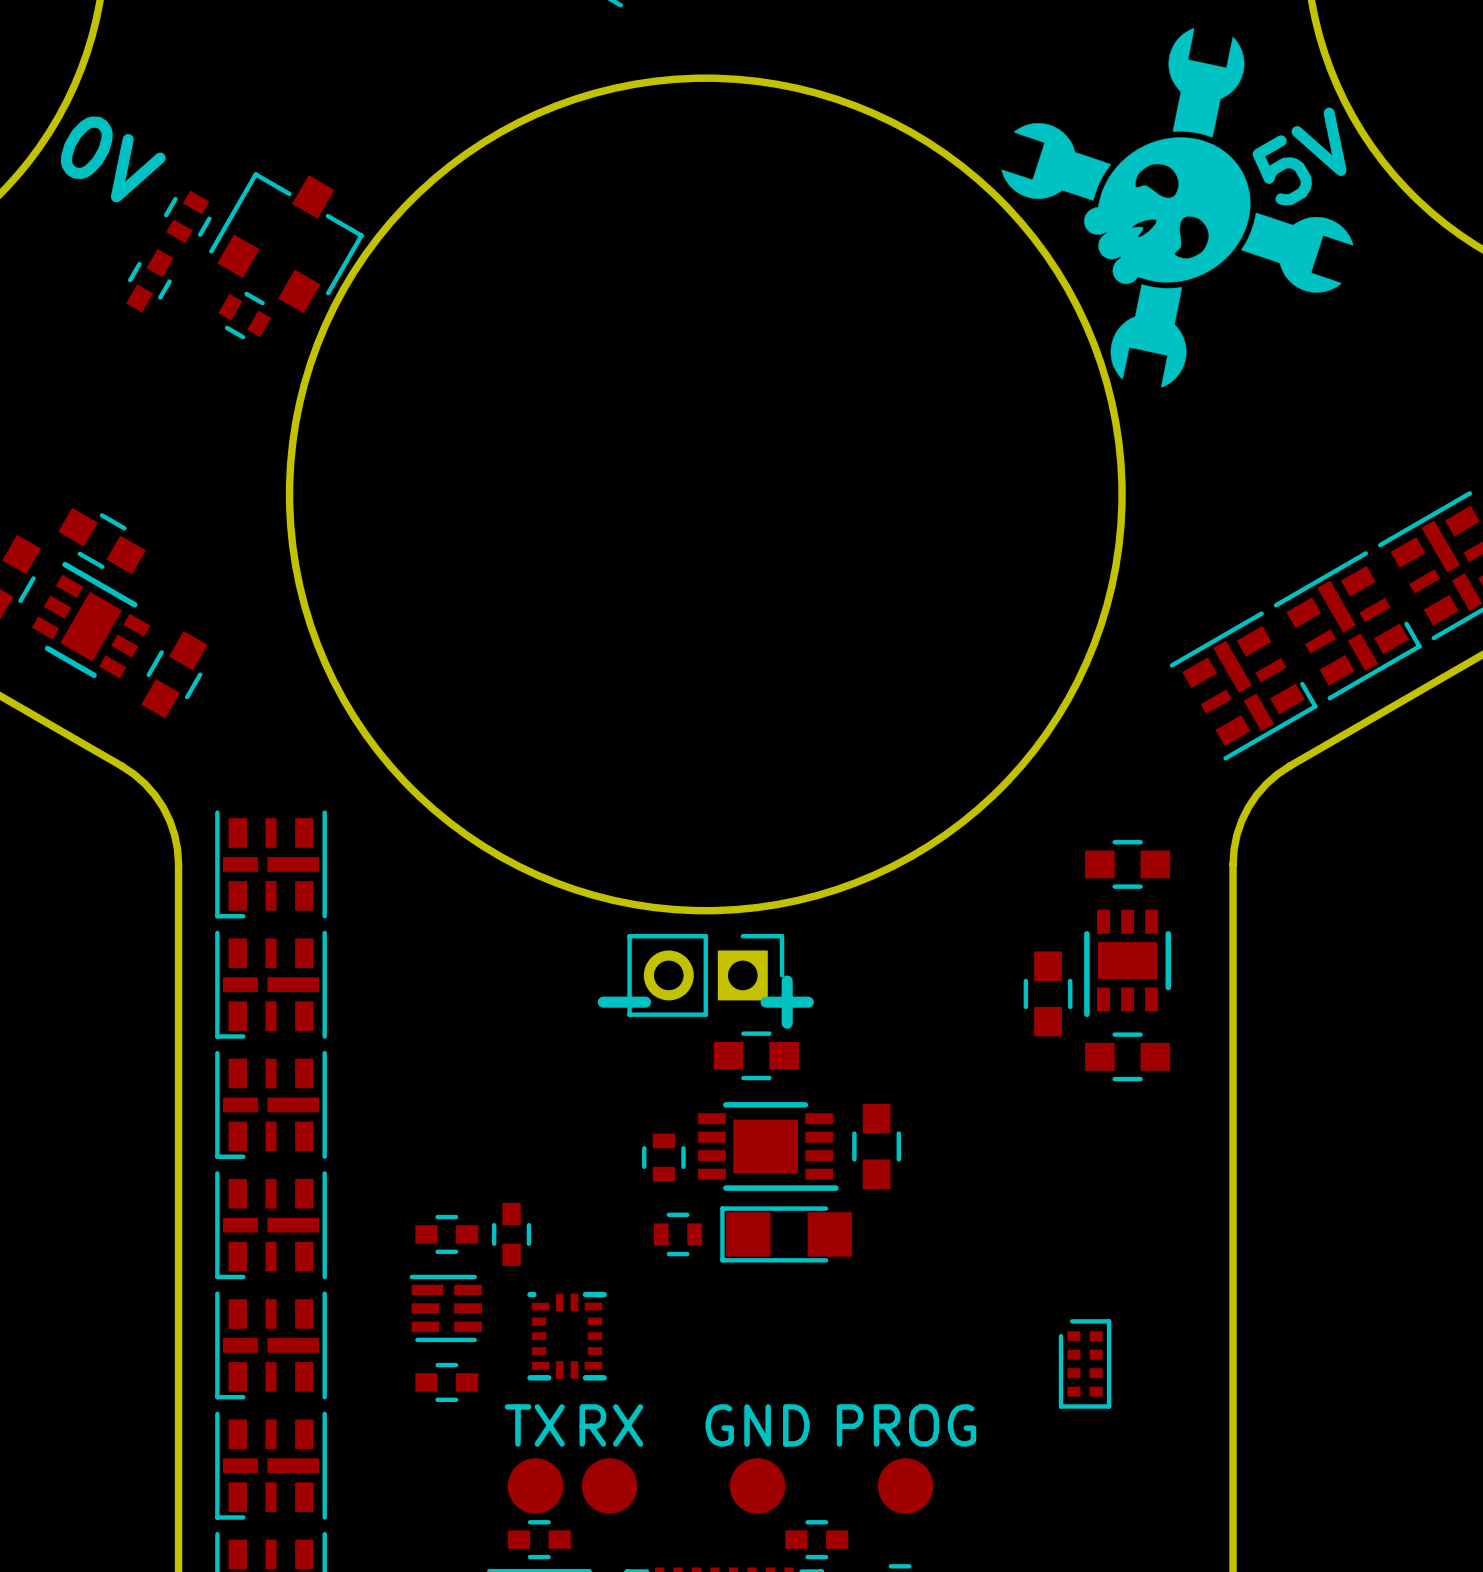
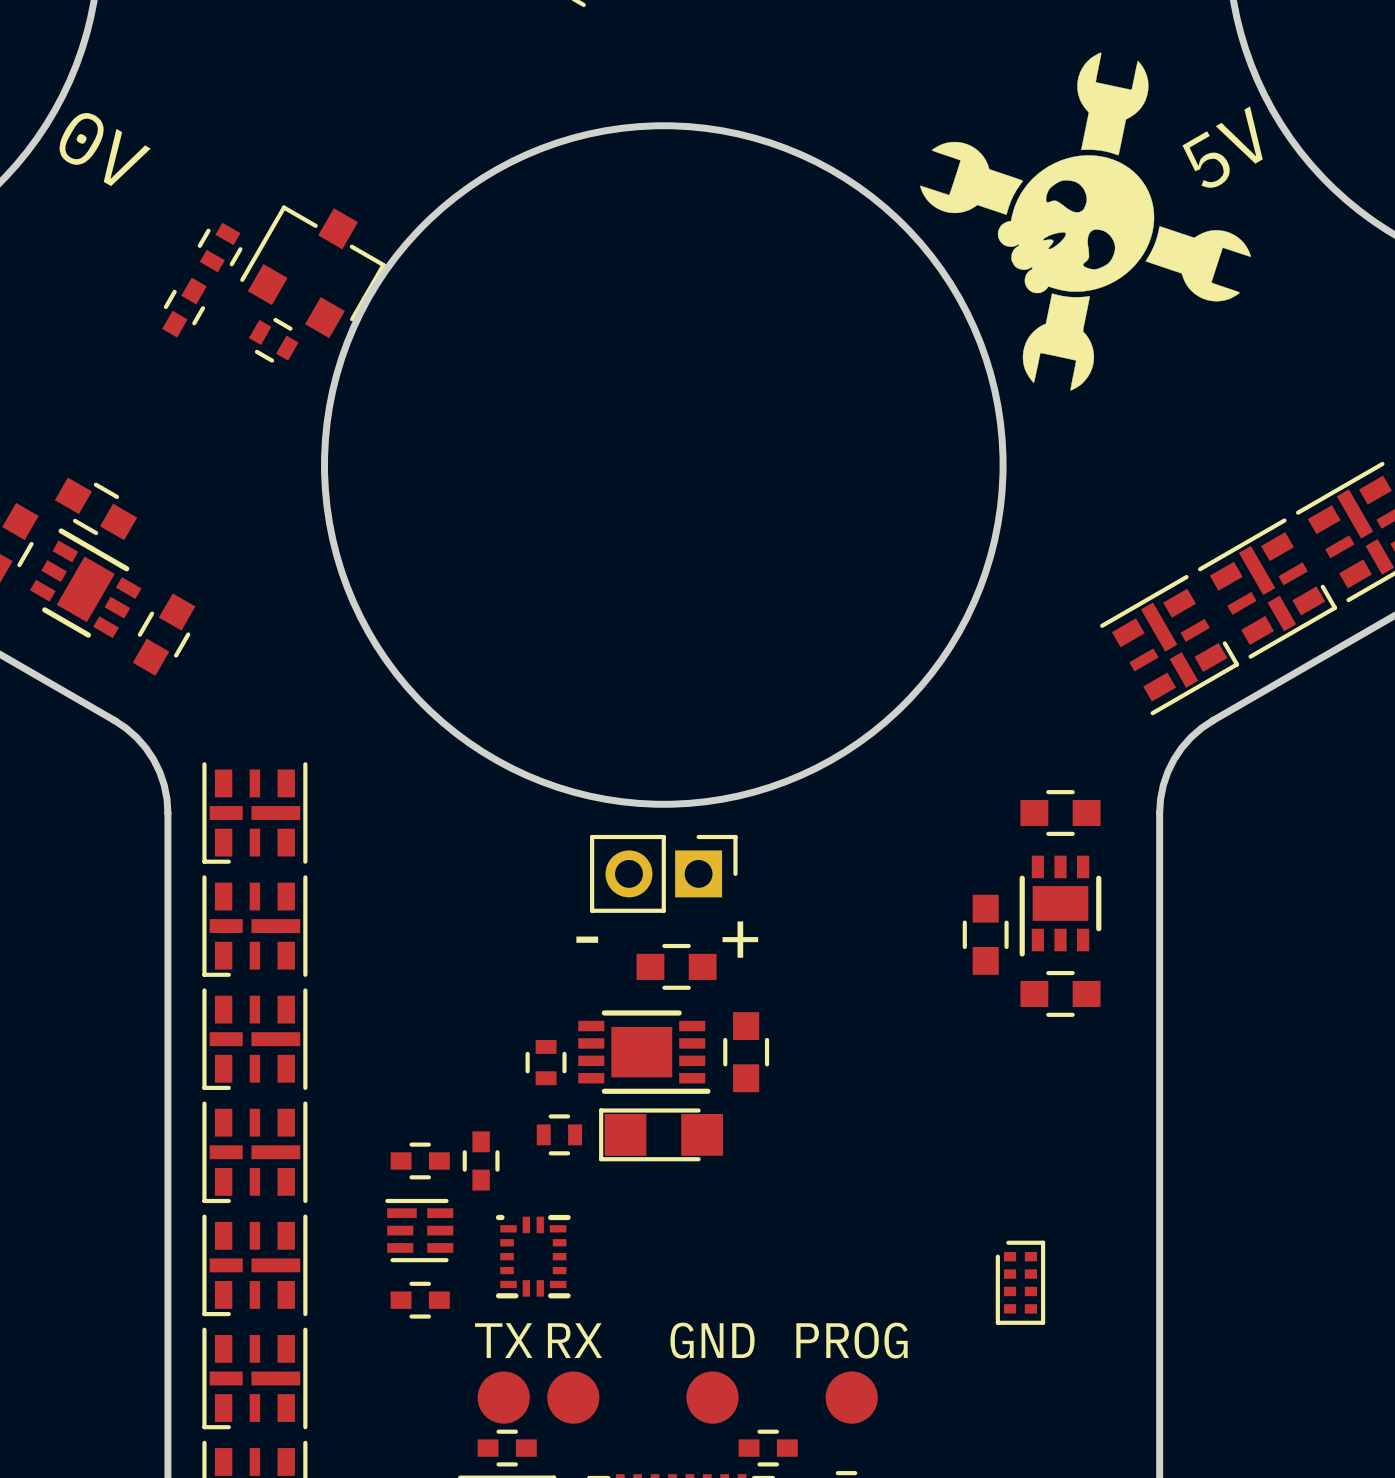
round board edge size: [285, 74, 1126, 915] -> [321, 122, 1007, 808]
drawing position: (1177, 207) -> (1085, 221)
part: (187, 216) -> none
part position: (286, 242) -> (312, 271)
part: none -> (220, 247)
part position: (149, 280) -> (184, 307)
part: (244, 315) -> none
part: none -> (273, 340)
part position: (705, 975) -> (663, 873)
part: none -> (676, 966)
part: (756, 1055) -> none
part: none -> (746, 1052)
part: none -> (546, 1062)
part position: (768, 1146) -> (644, 1052)
part: (876, 1146) -> none
part: (663, 1157) -> none
part: none -> (559, 1134)
part: (678, 1234) -> none
part position: (786, 1234) -> (661, 1134)

